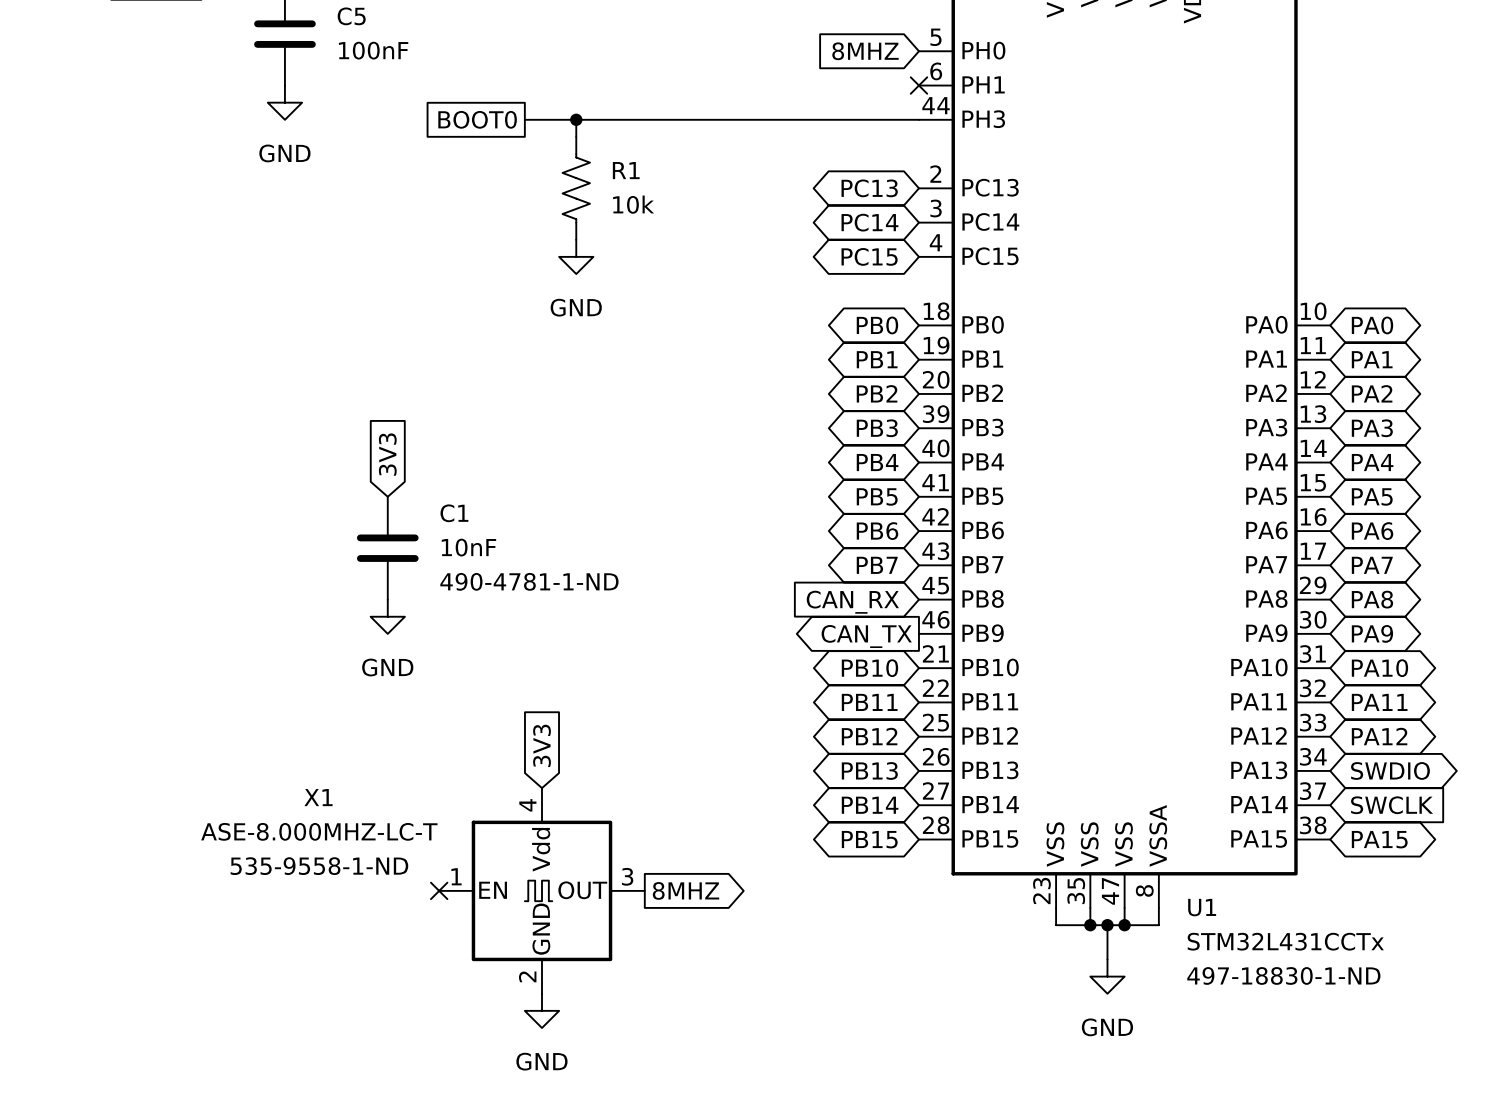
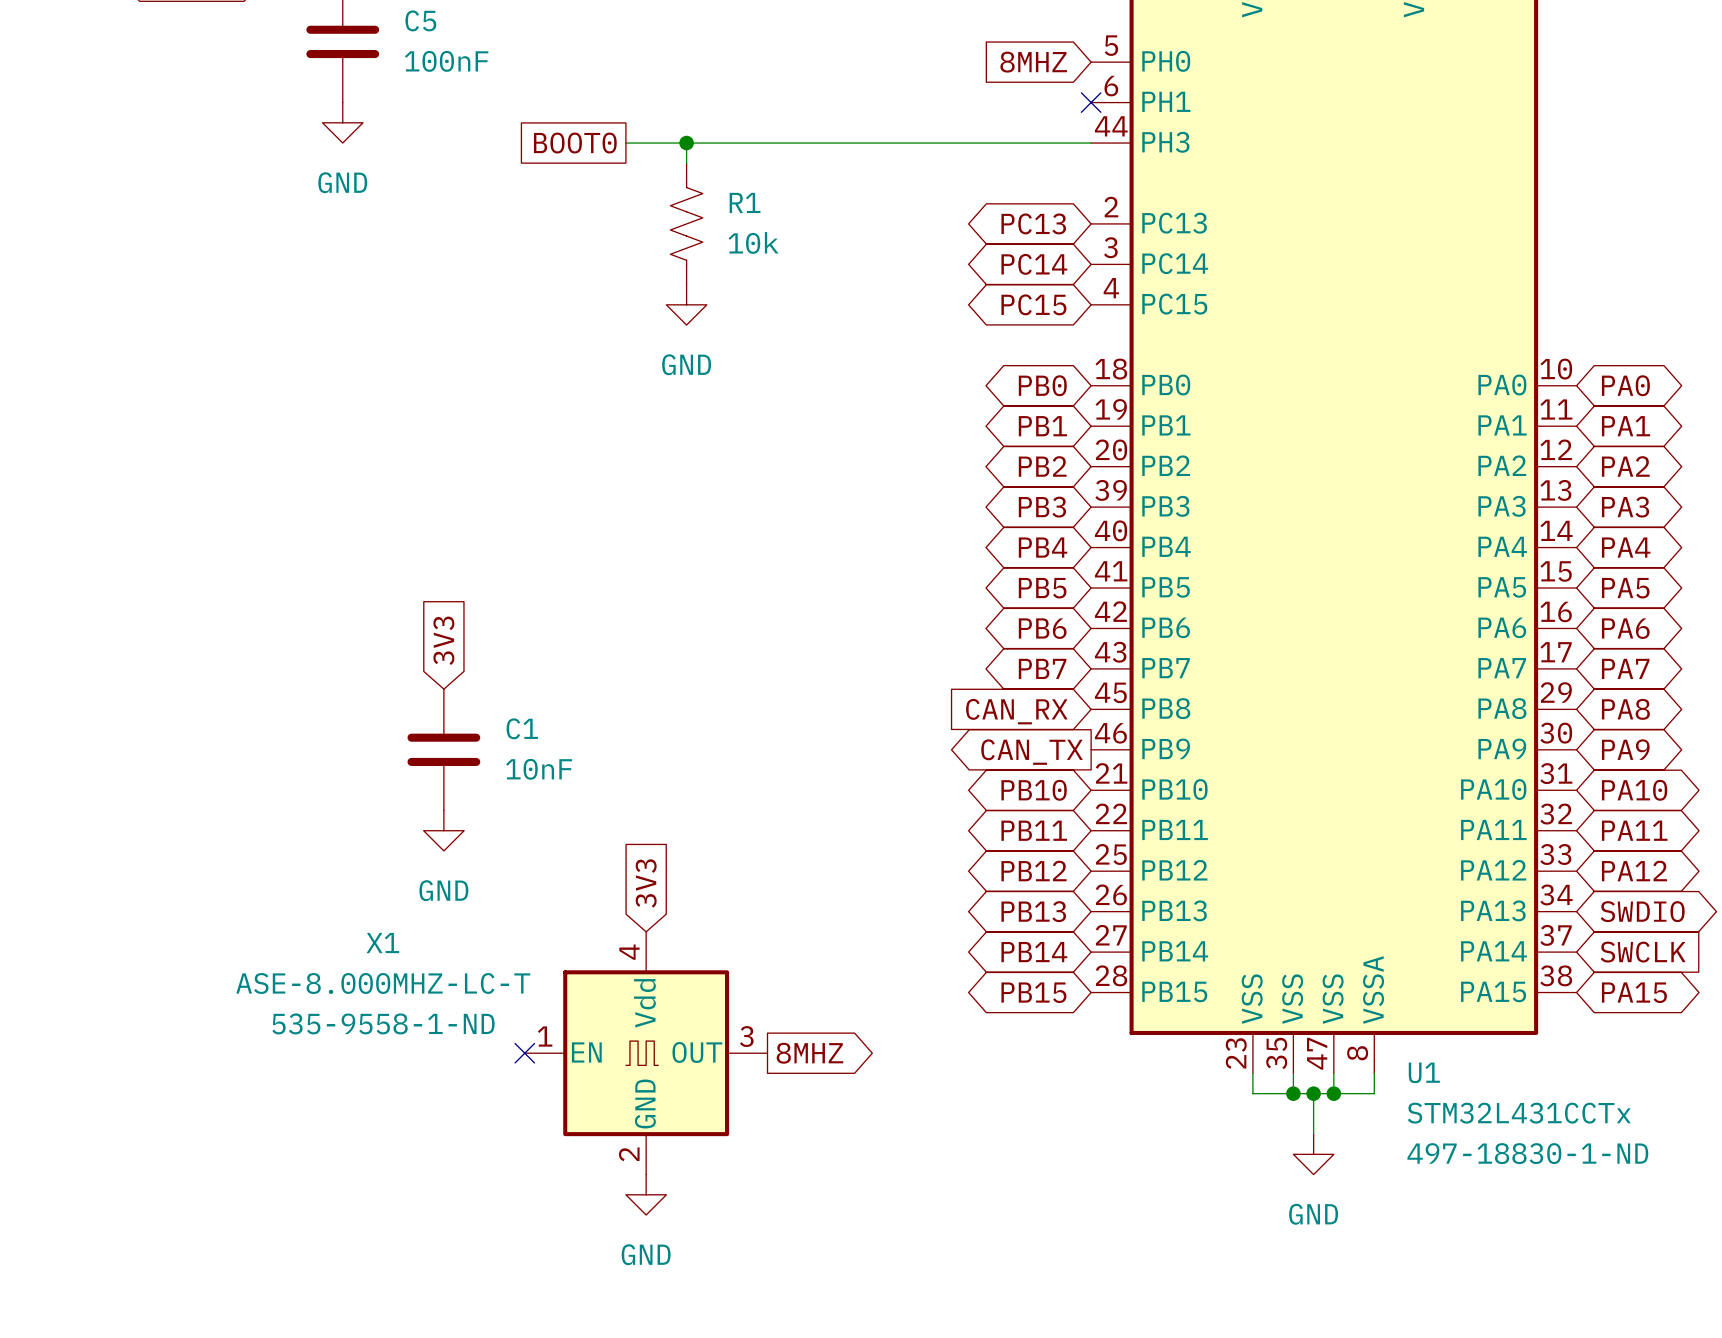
global label position: 3V3 (387, 454) -> 3V3 (443, 640)
C1 name position: C1 (454, 513) -> C1 (522, 728)
C1 value position: 10nF (468, 547) -> 10nF (539, 769)
C1 position: (387, 548) -> (443, 749)
C1 text: 490-4781-1-ND (529, 581) -> none
power symbol position: GND (387, 616) -> GND (443, 830)

